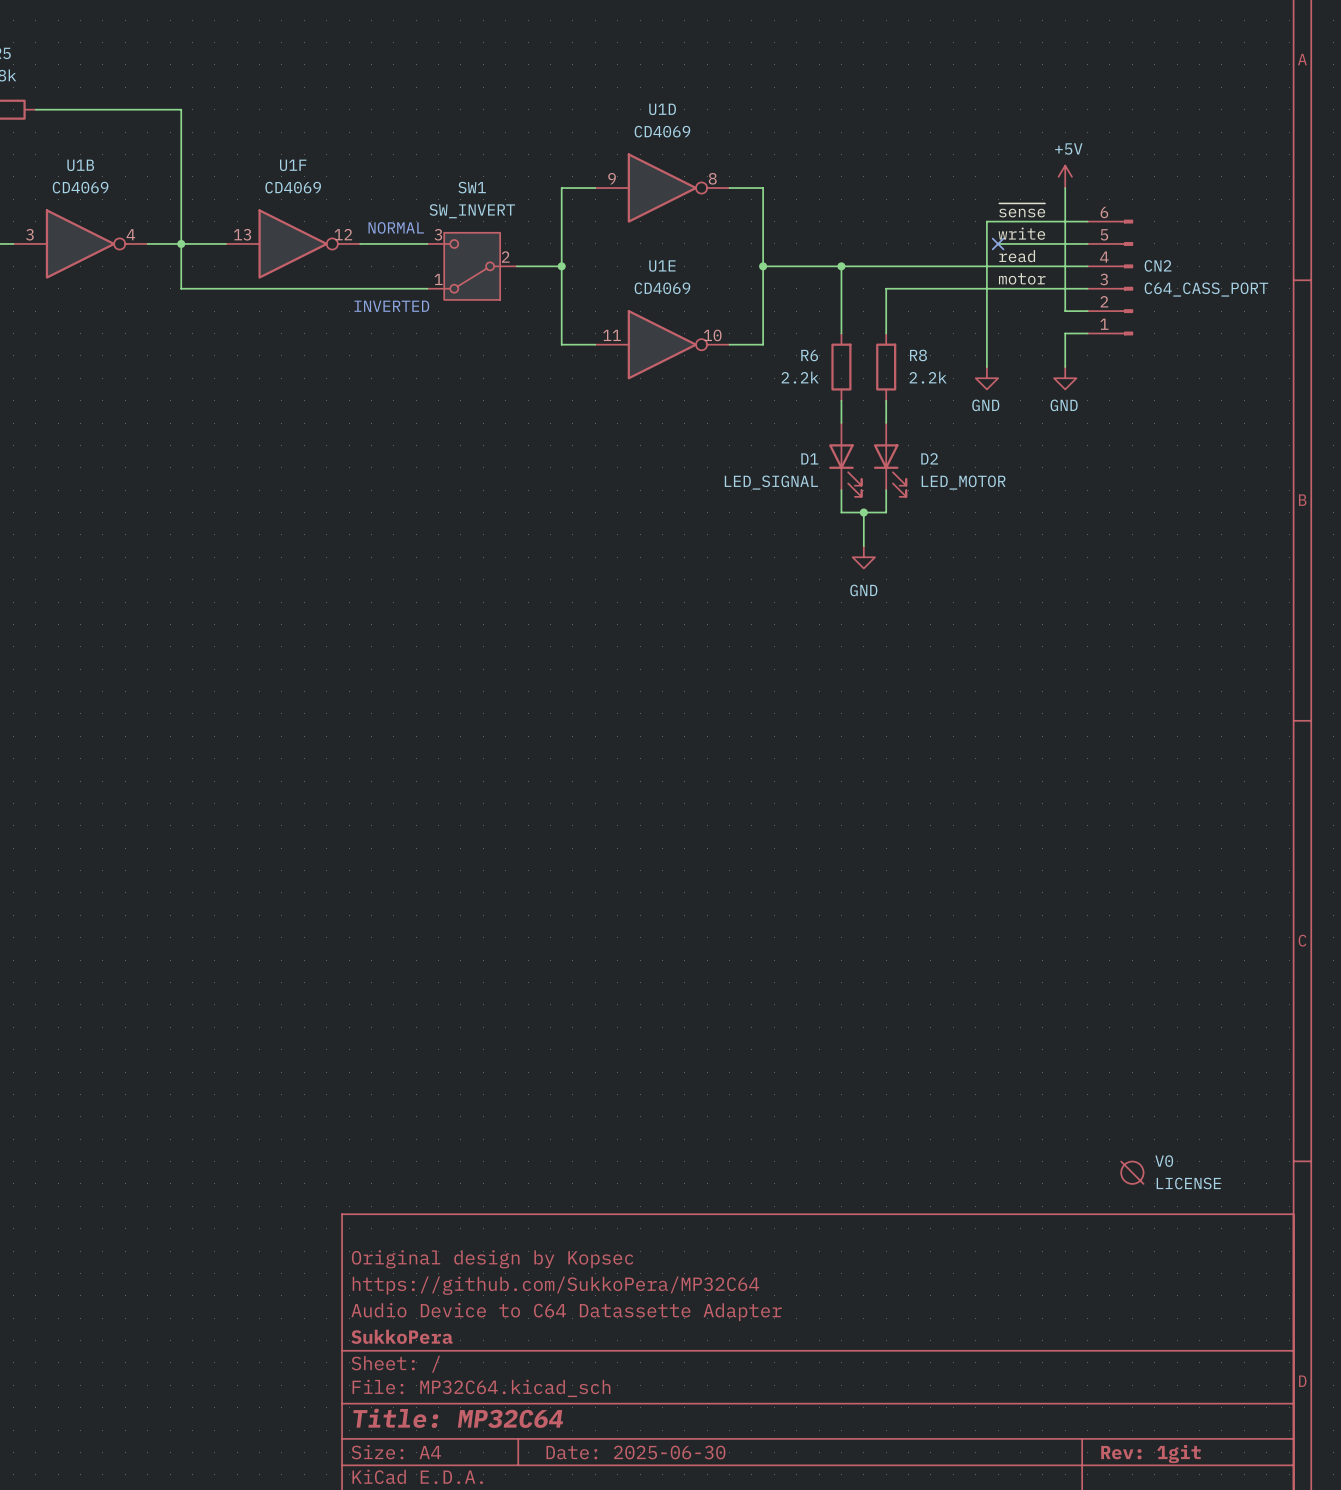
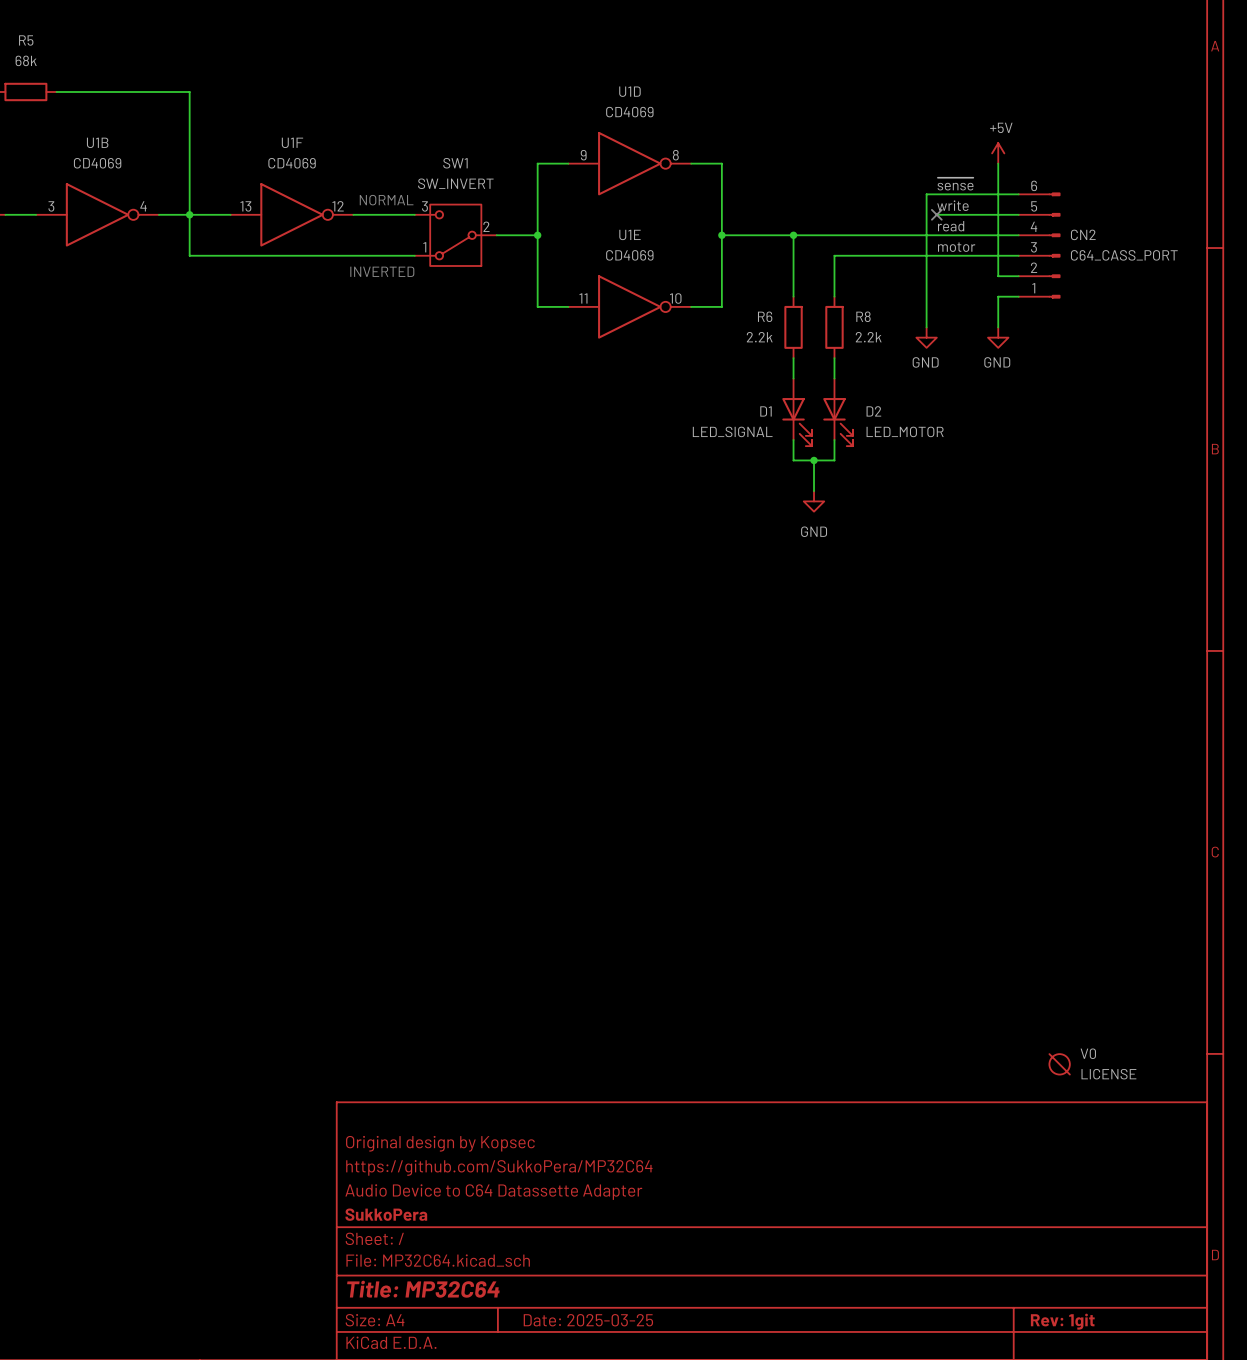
title block: Date: 2025-06-30 (635, 1452) -> Date: 2025-03-25 (588, 1320)

